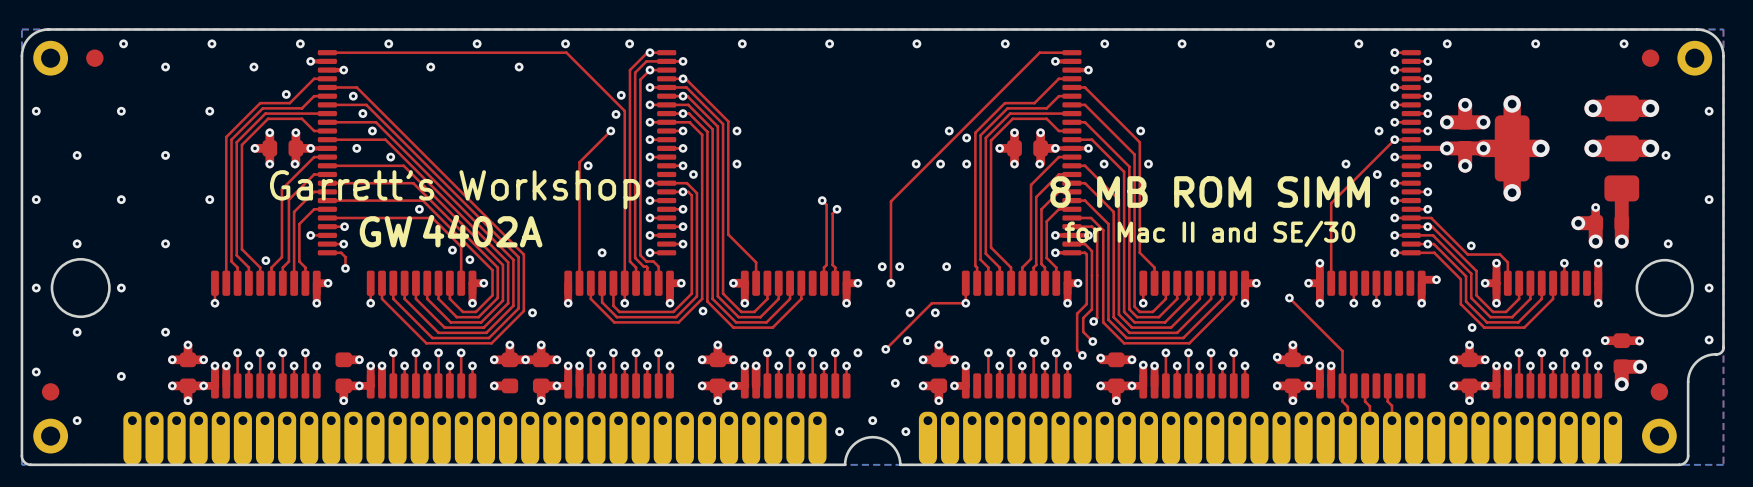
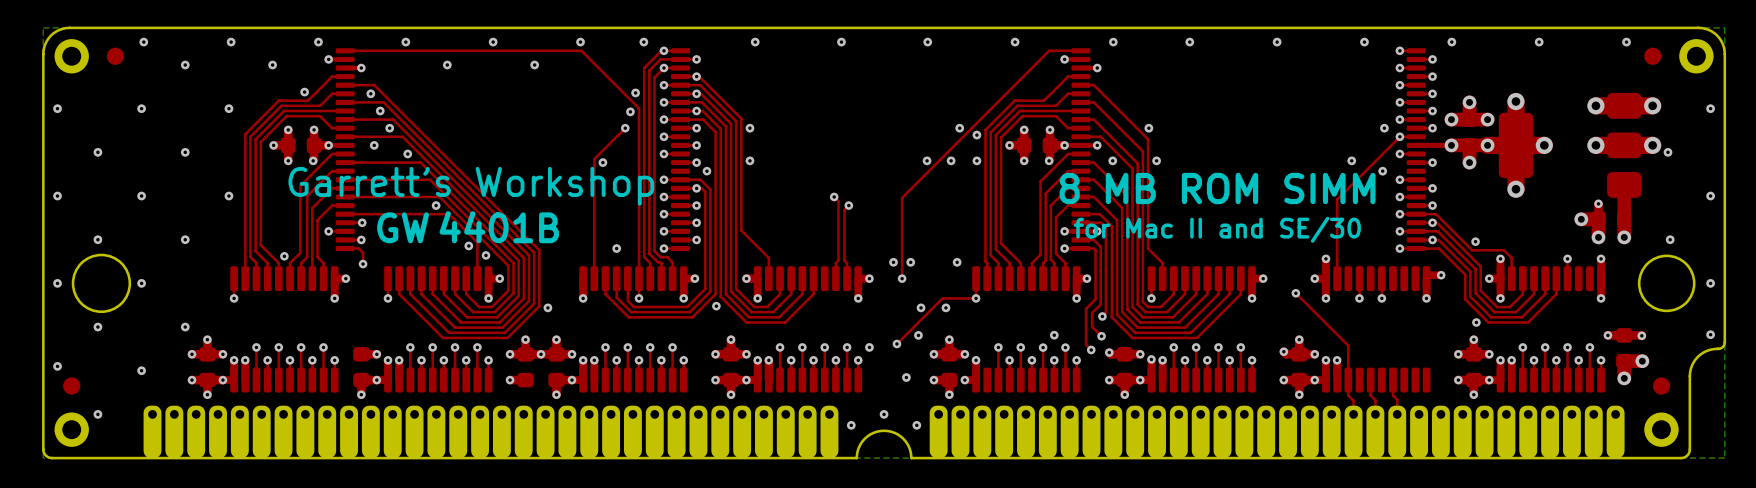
text: 4402A (482, 231) -> 4401B (499, 227)

